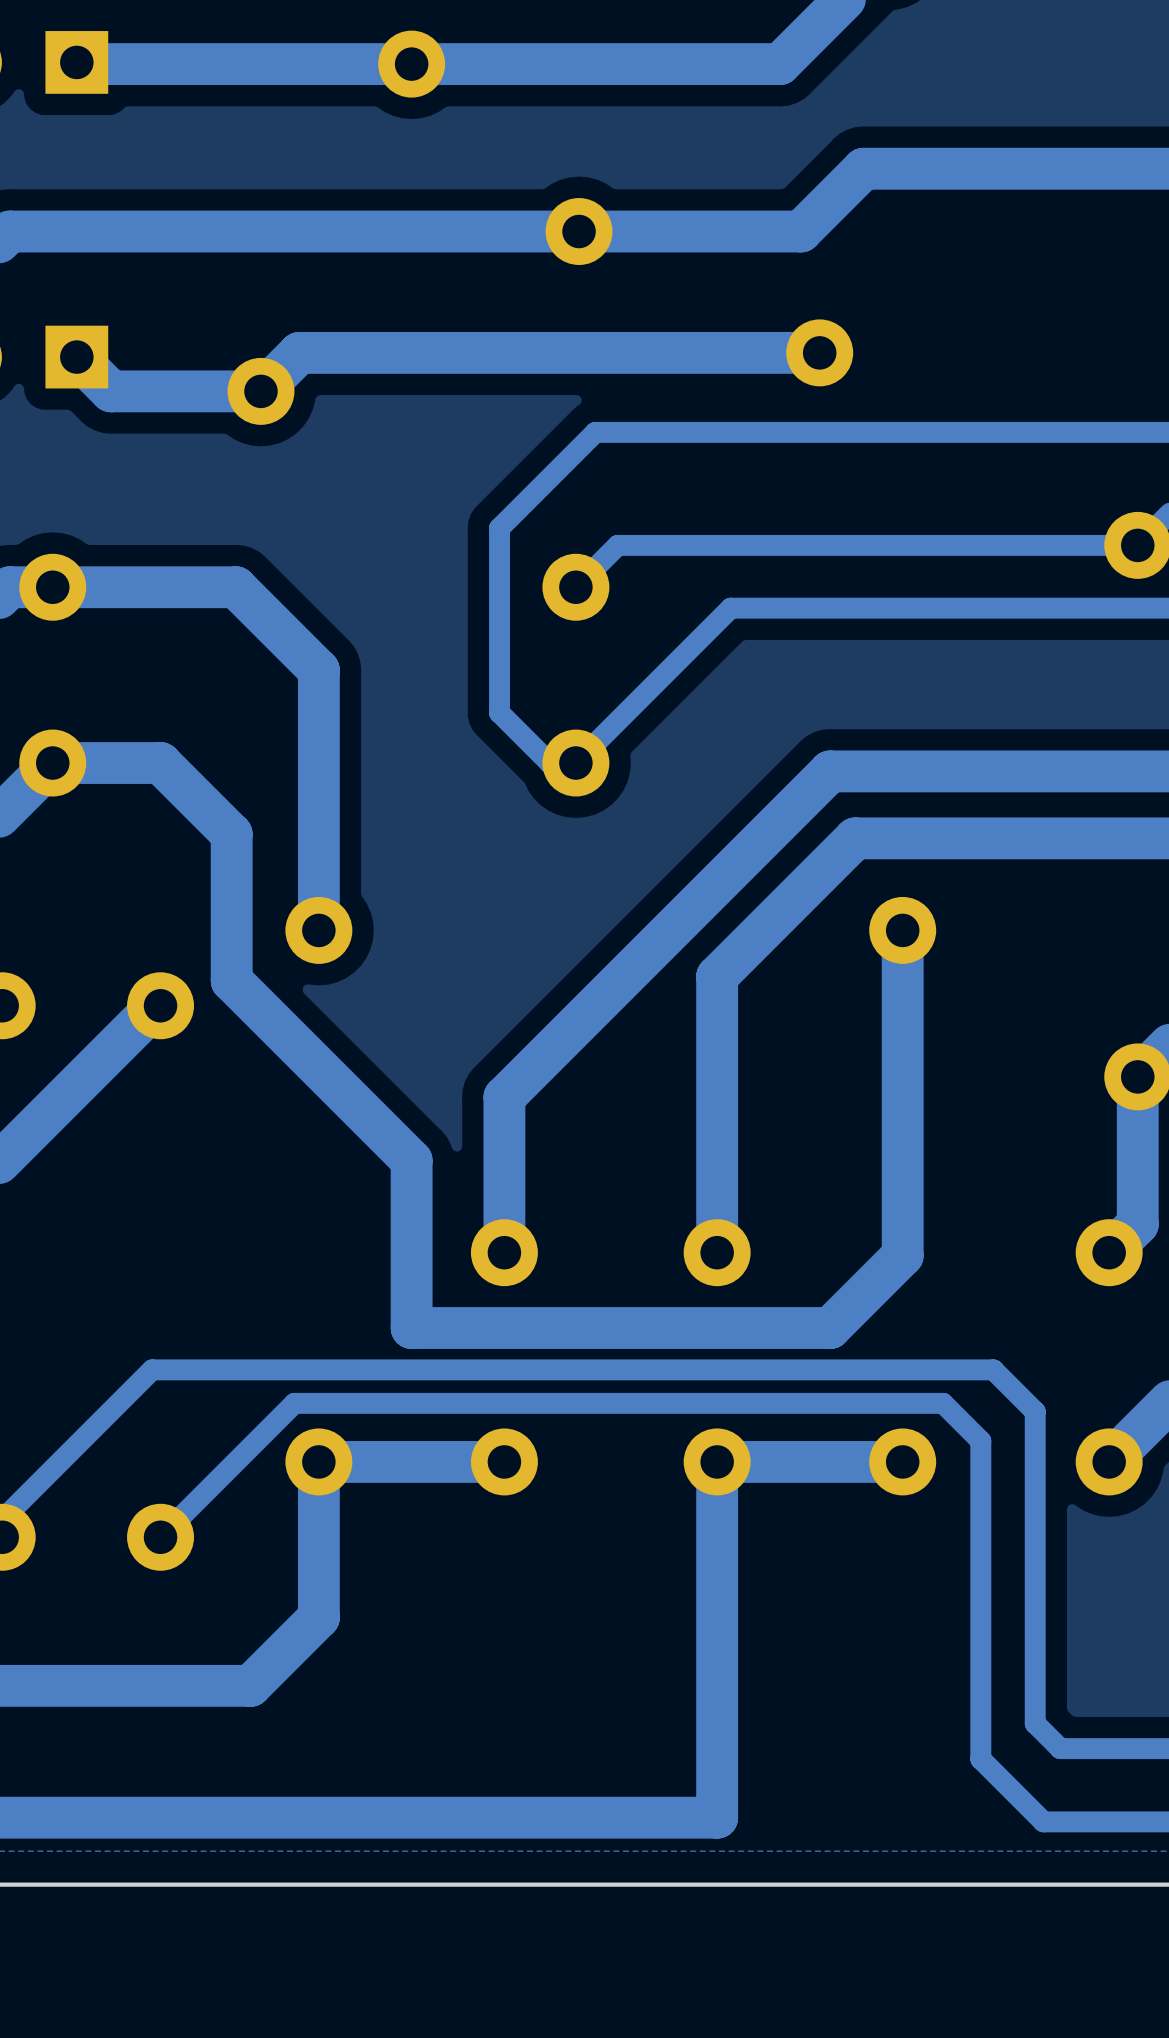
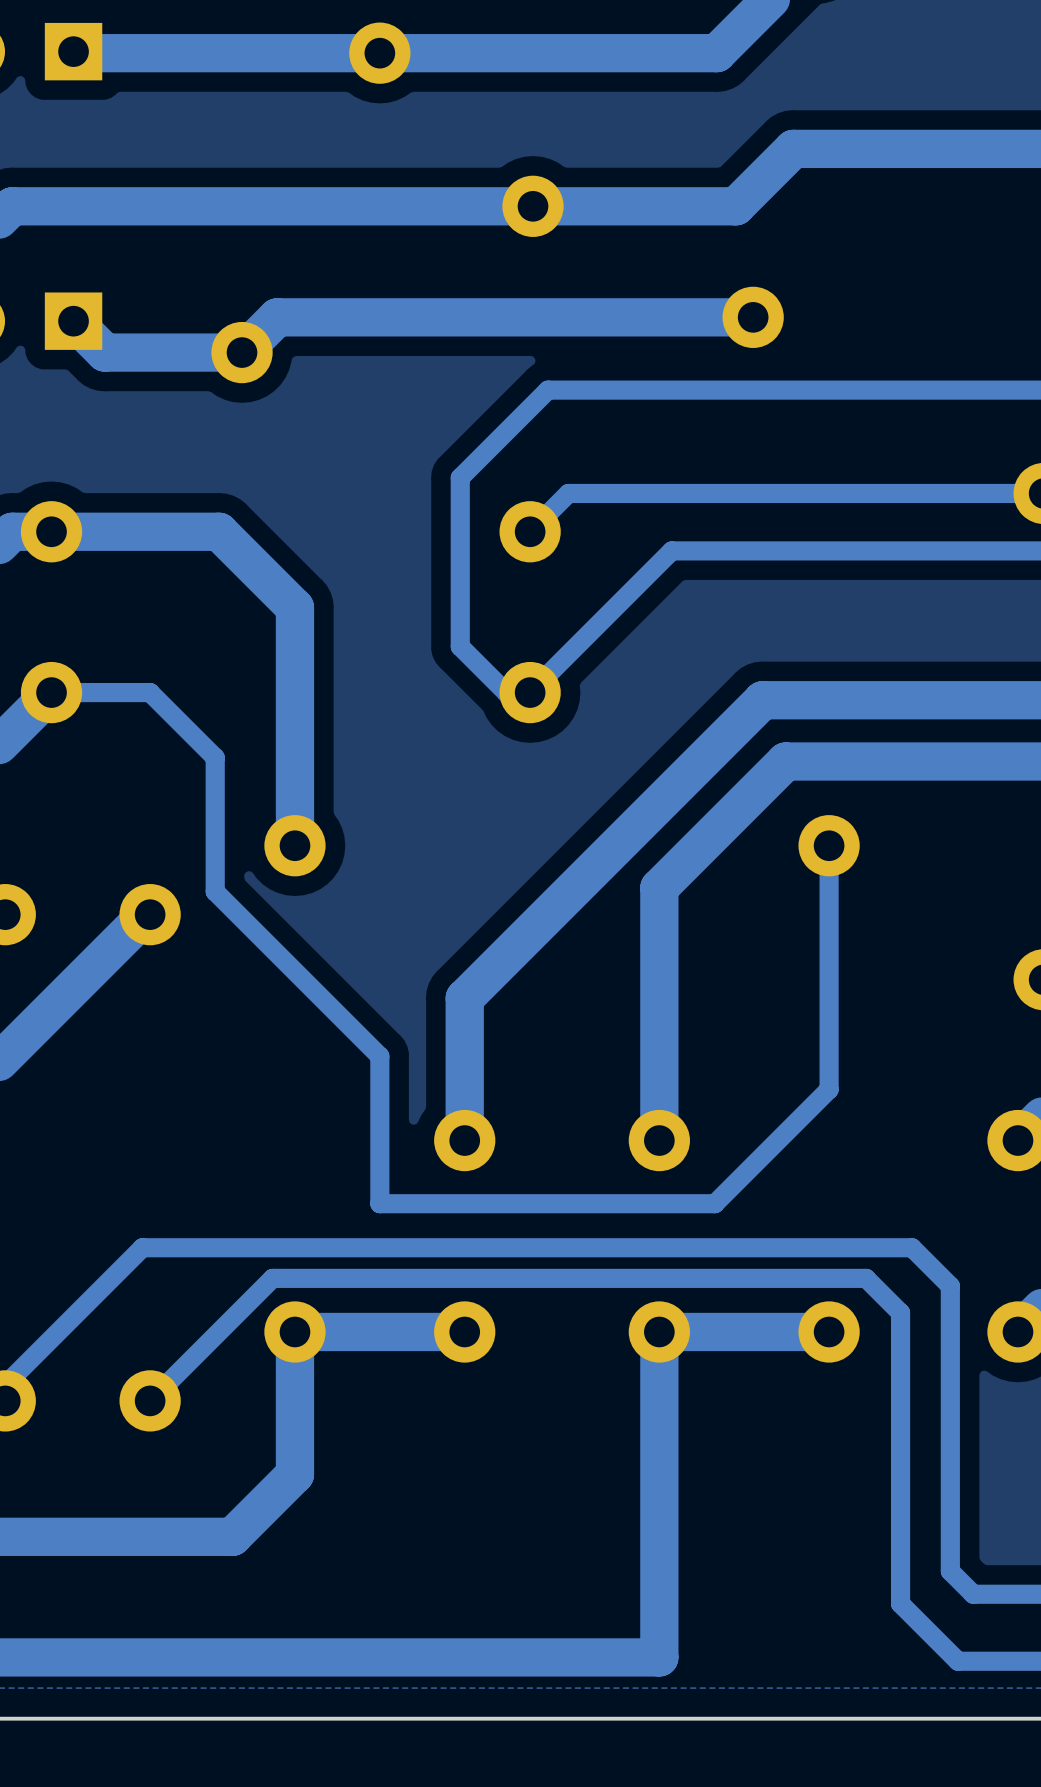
track width: thick (52, 763) (160, 763) (231, 834) (231, 980) (411, 1160) (411, 1321) -> thin (51, 692) (150, 692) (215, 757) (215, 891) (379, 1056) (379, 1203)
track width: thick (902, 930) (902, 1196) -> thin (829, 845) (829, 1089)
track: (902, 1196) (902, 1255) (830, 1328) (411, 1328) (411, 1321) -> (829, 1089) (714, 1203) (379, 1203)

